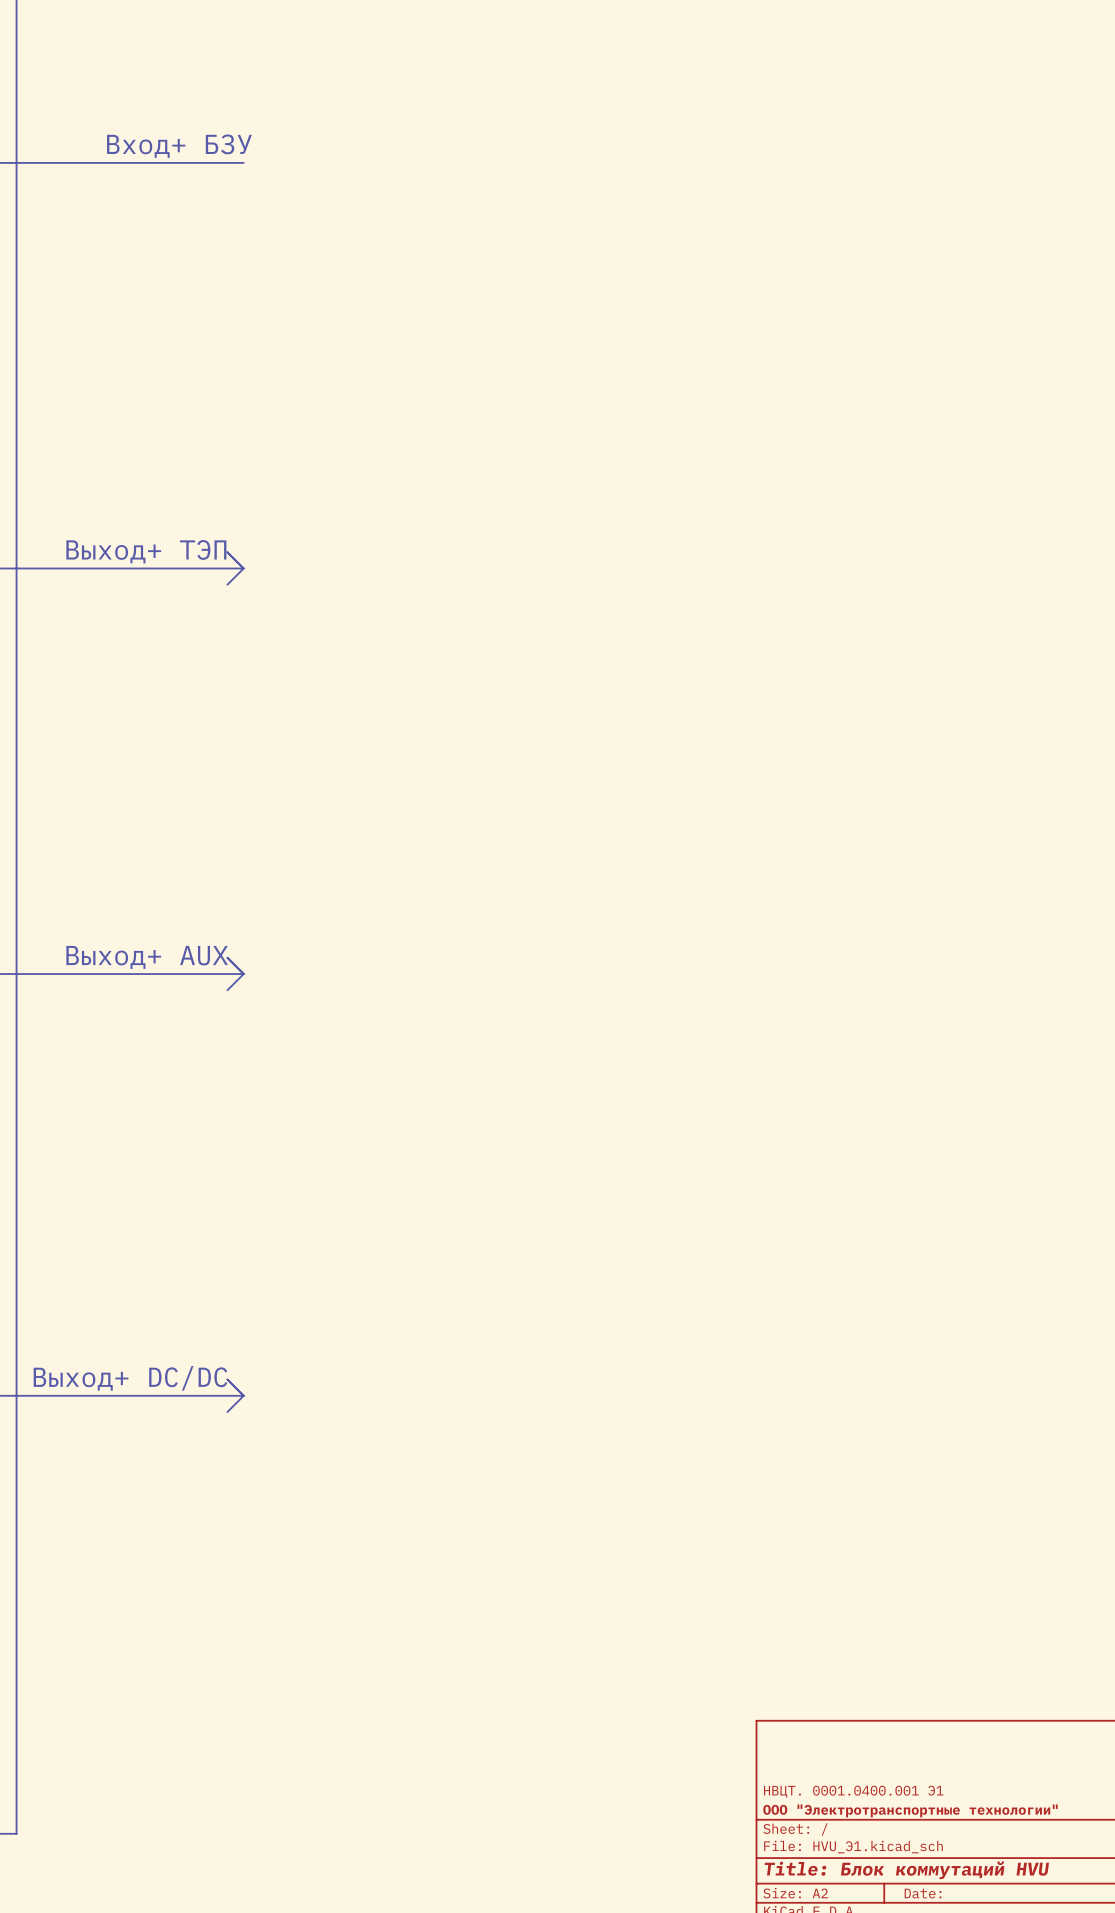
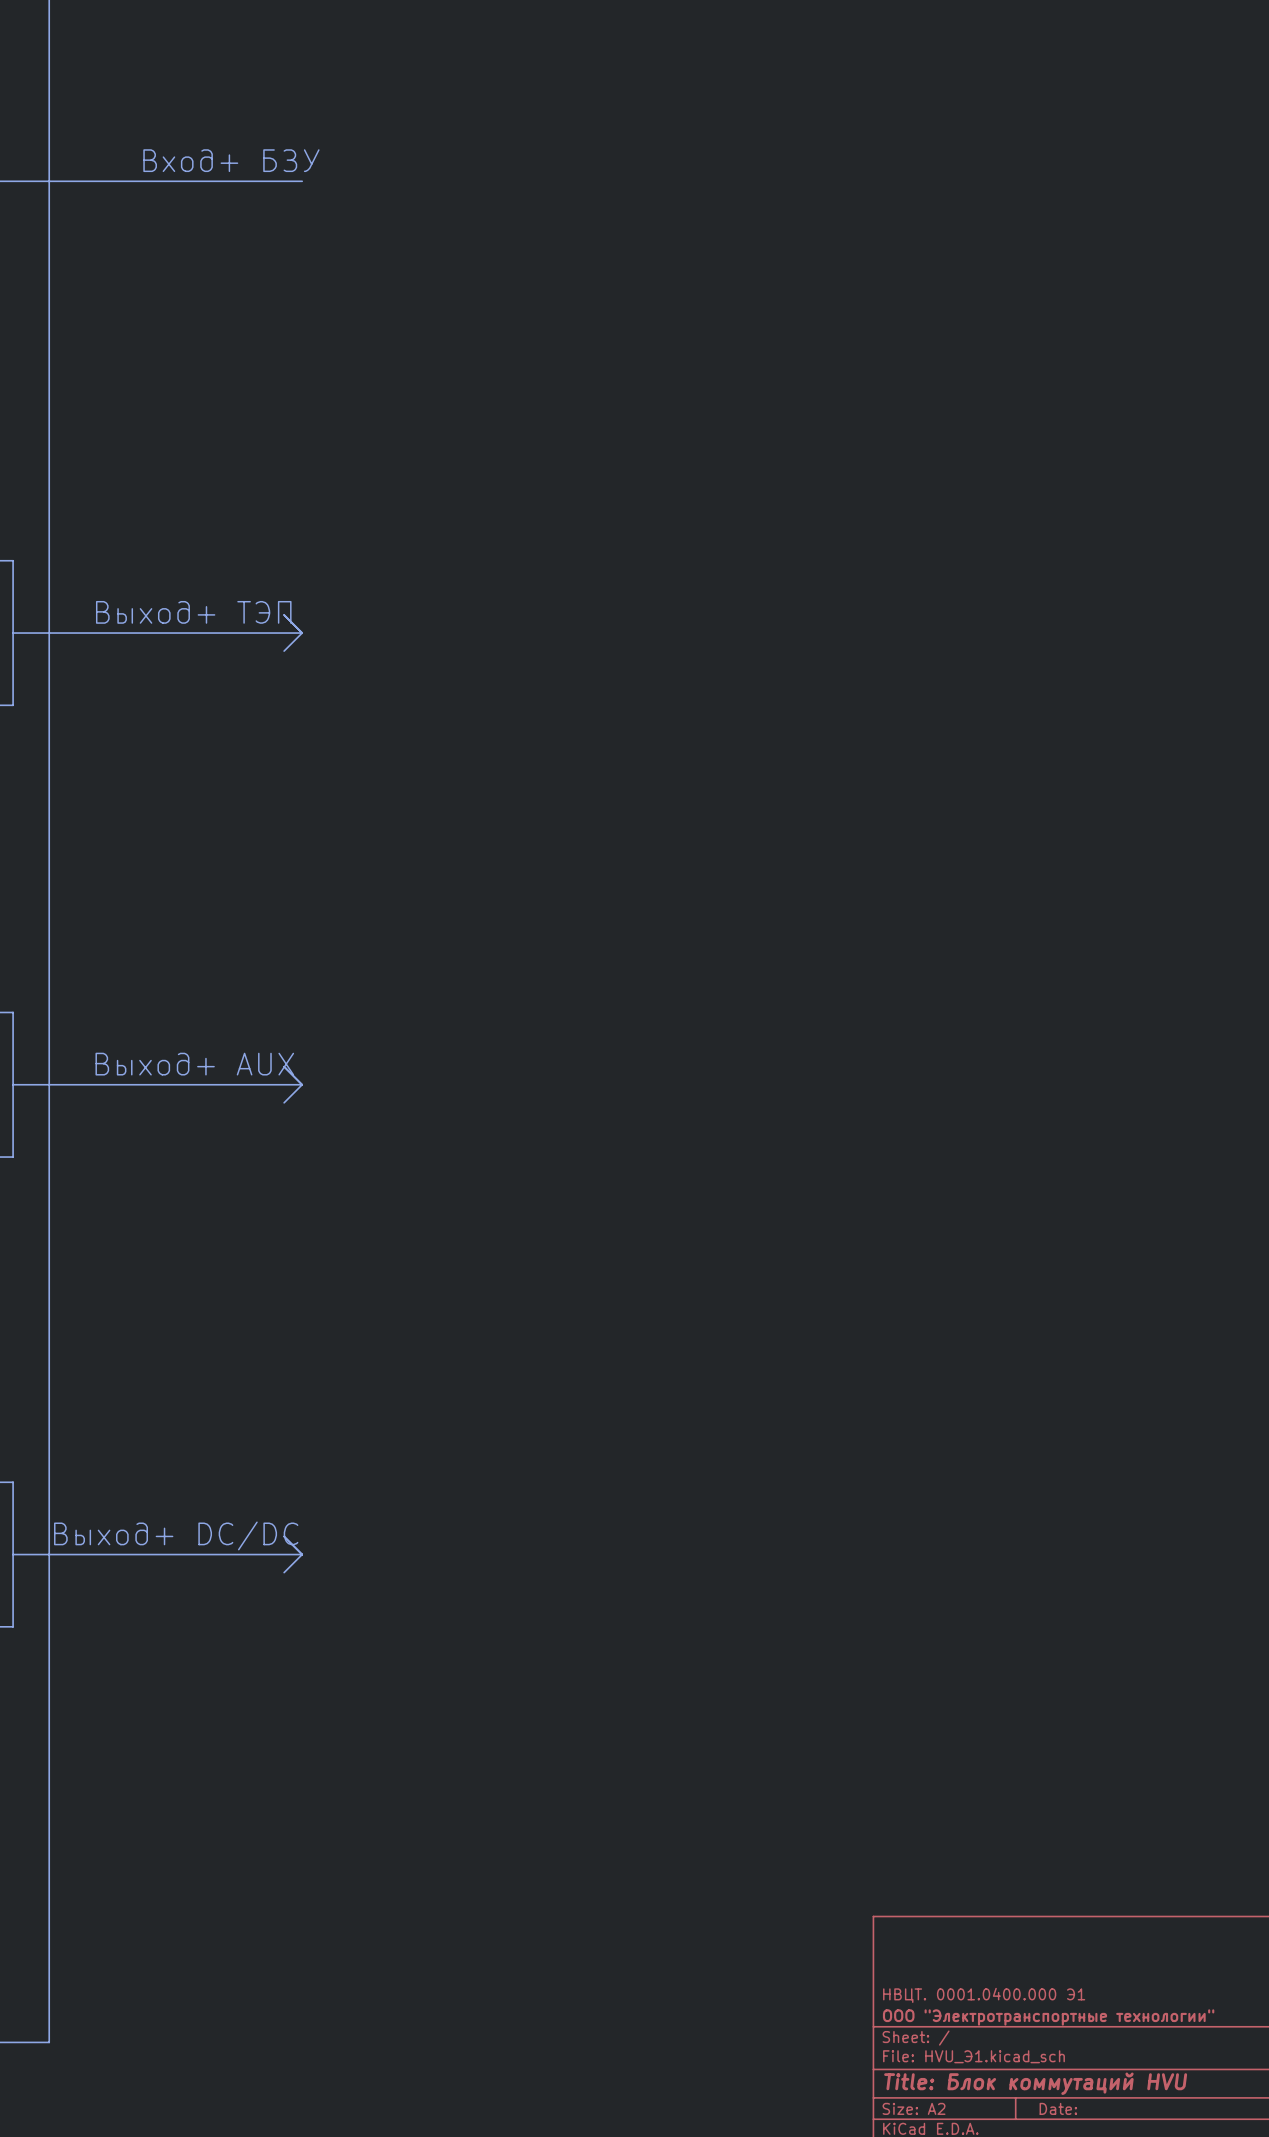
title block: НВЦТ. 0001.0400.001 Э1 (853, 1791) -> НВЦТ. 0001.0400.000 Э1 (984, 1995)

